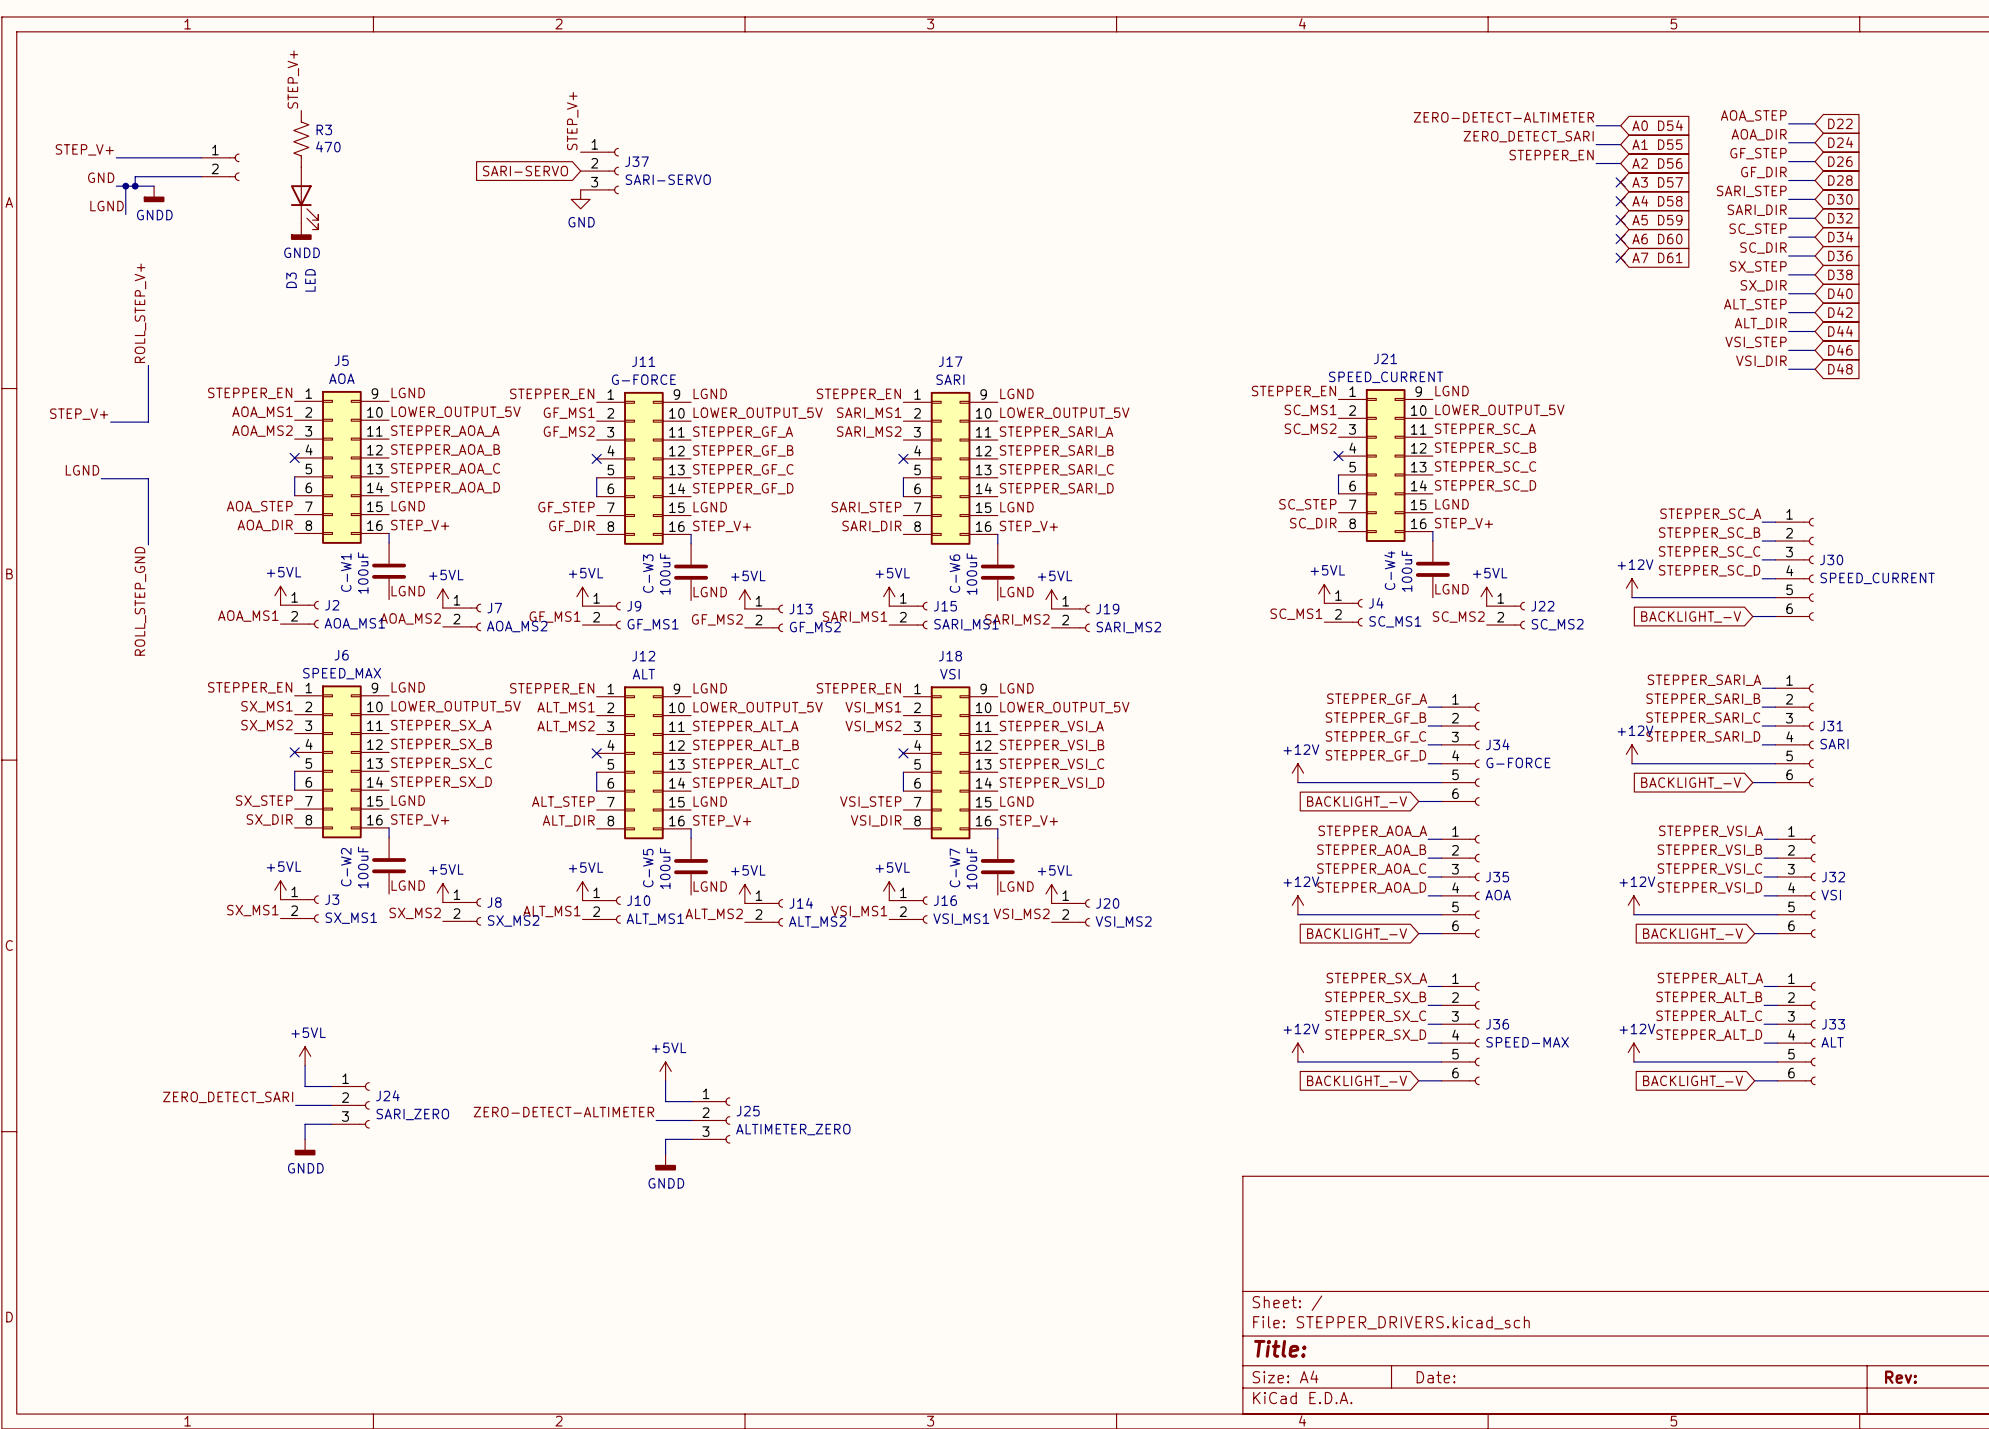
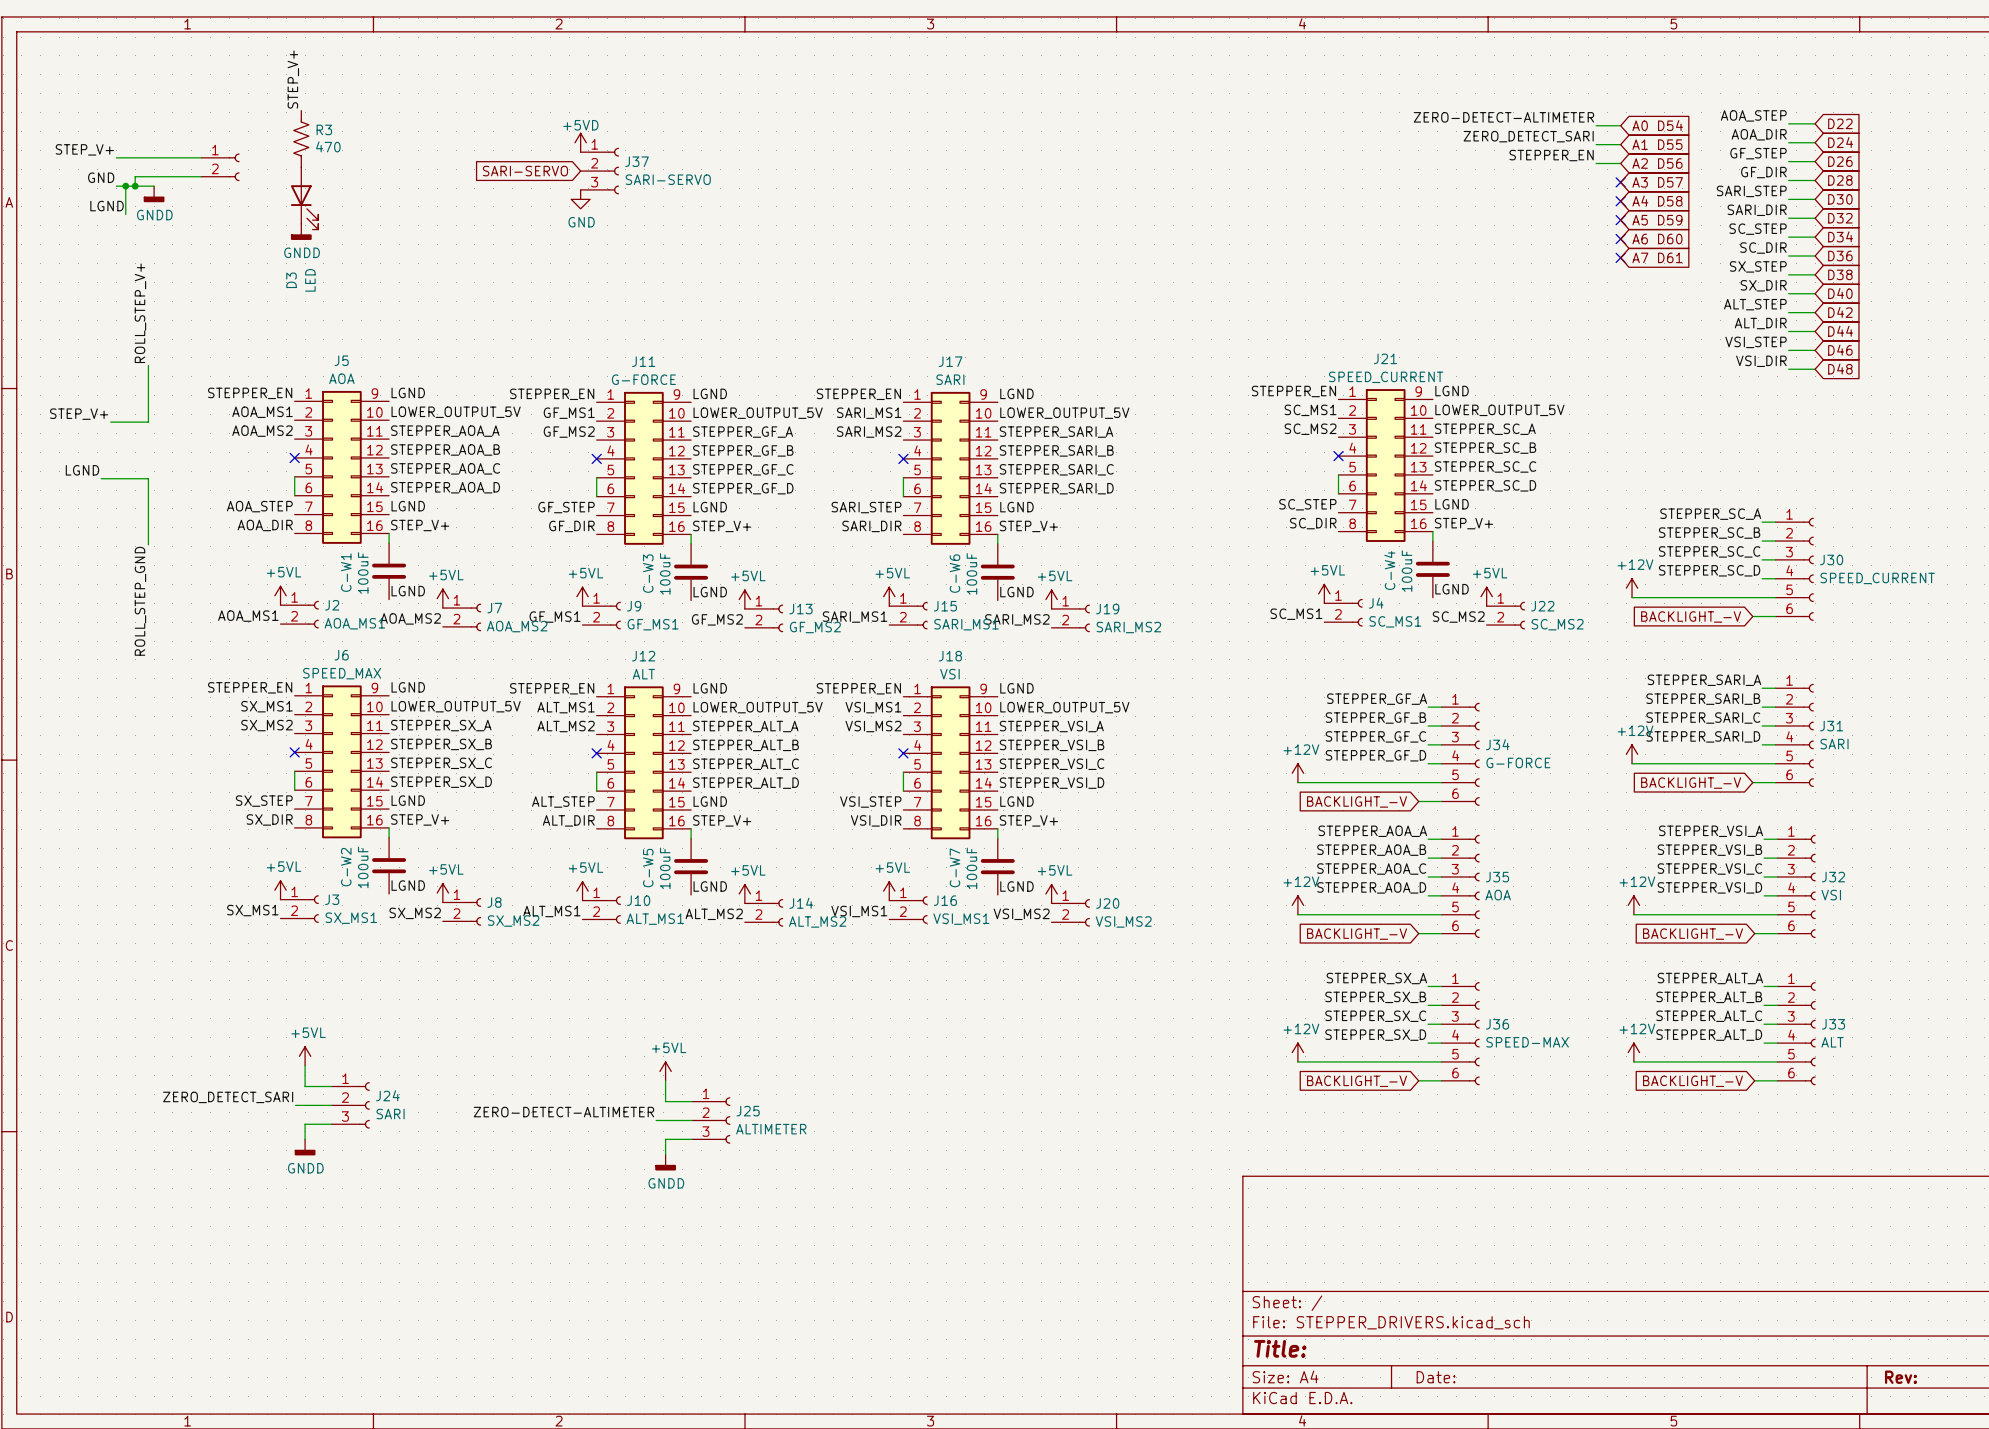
label: STEP_V+ (572, 121) -> none
power symbol: none -> +5VD (580, 142)
J24 value: SARI_ZERO (412, 1114) -> SARI (390, 1114)
J25 value: ALTIMETER_ZERO (793, 1129) -> ALTIMETER (771, 1129)

